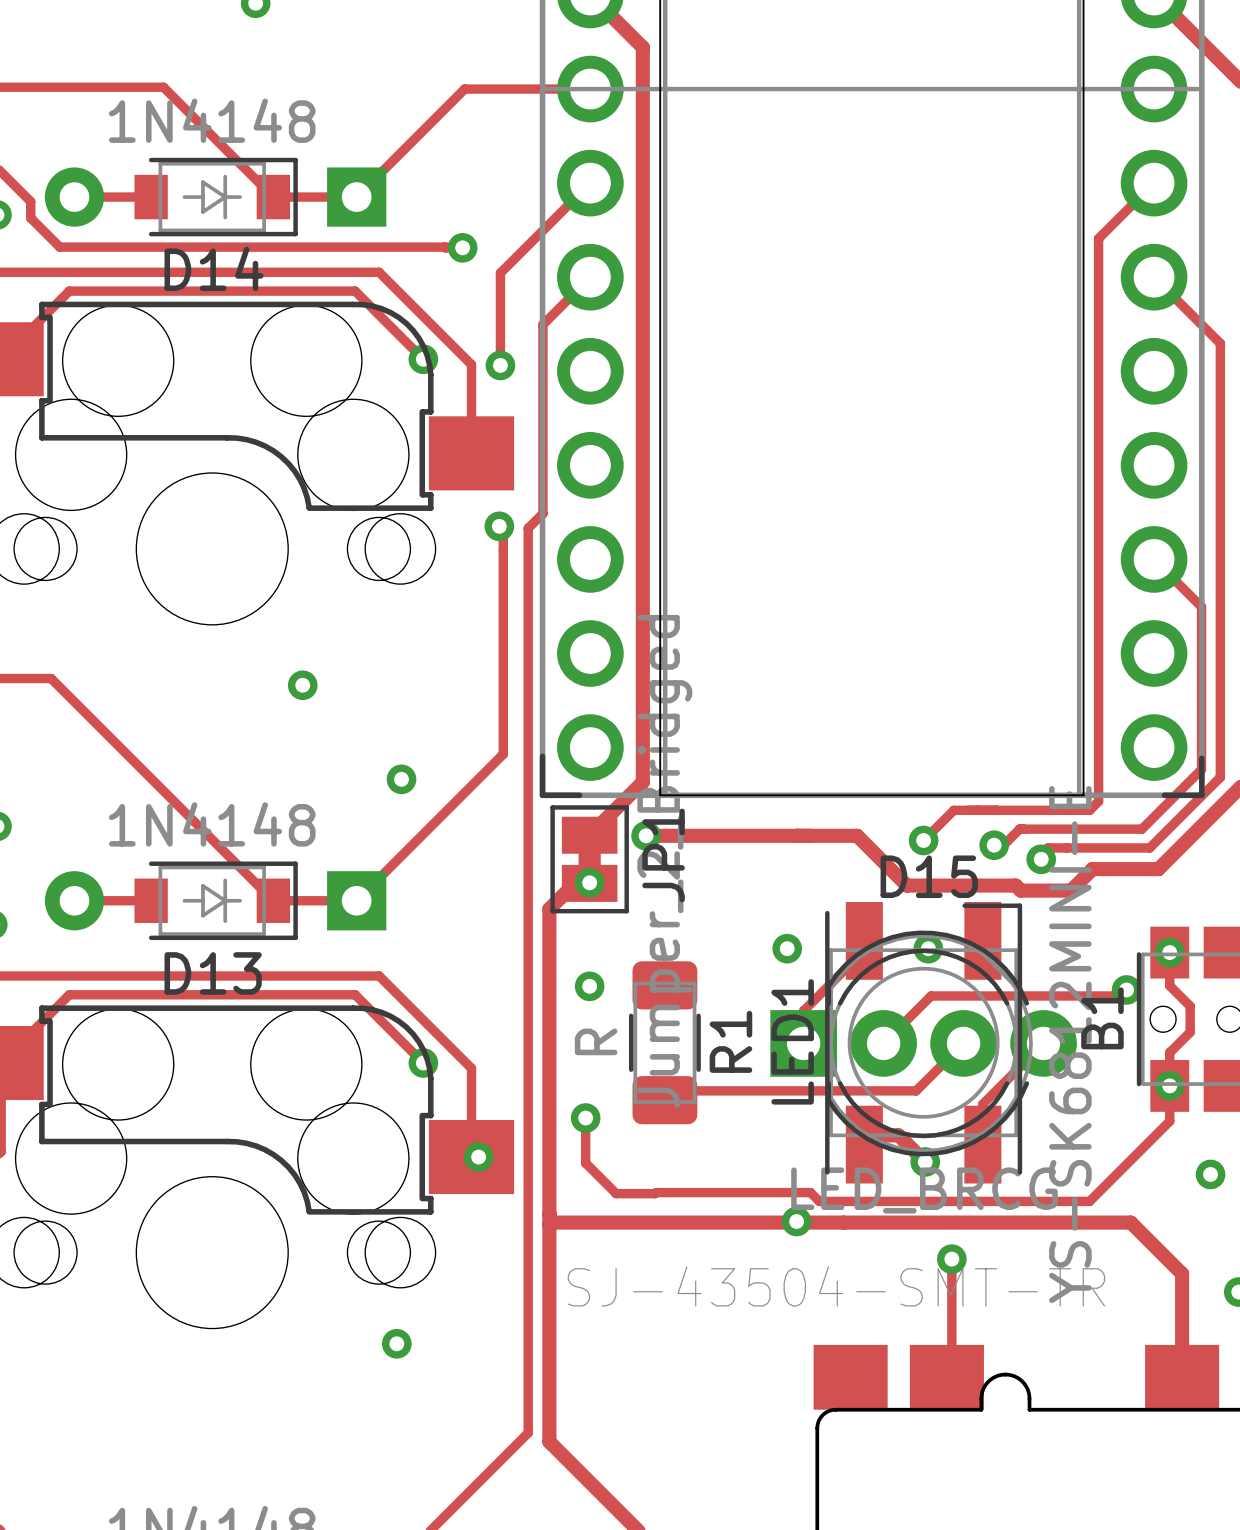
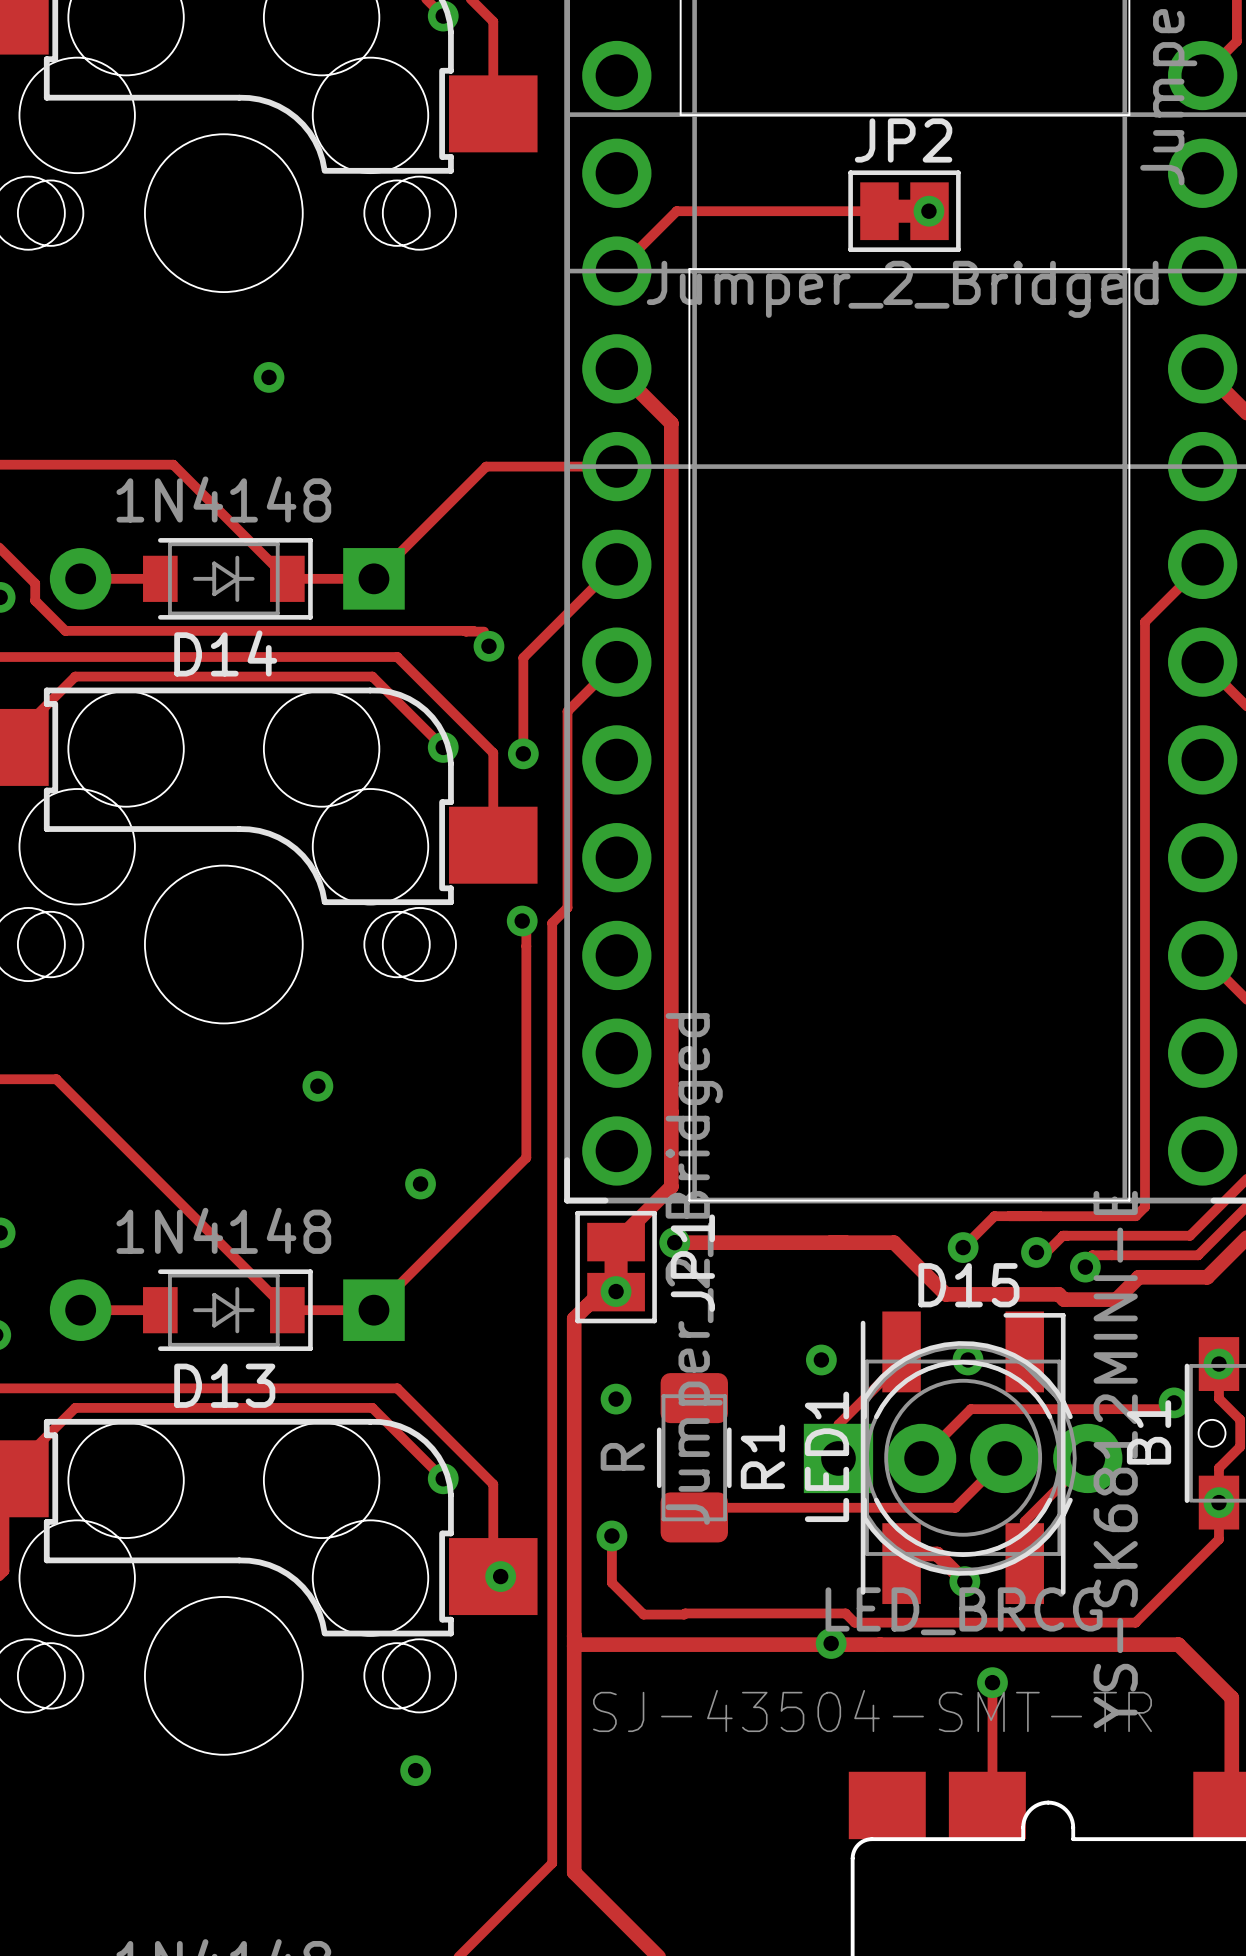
via position: (462, 247) -> (488, 646)

